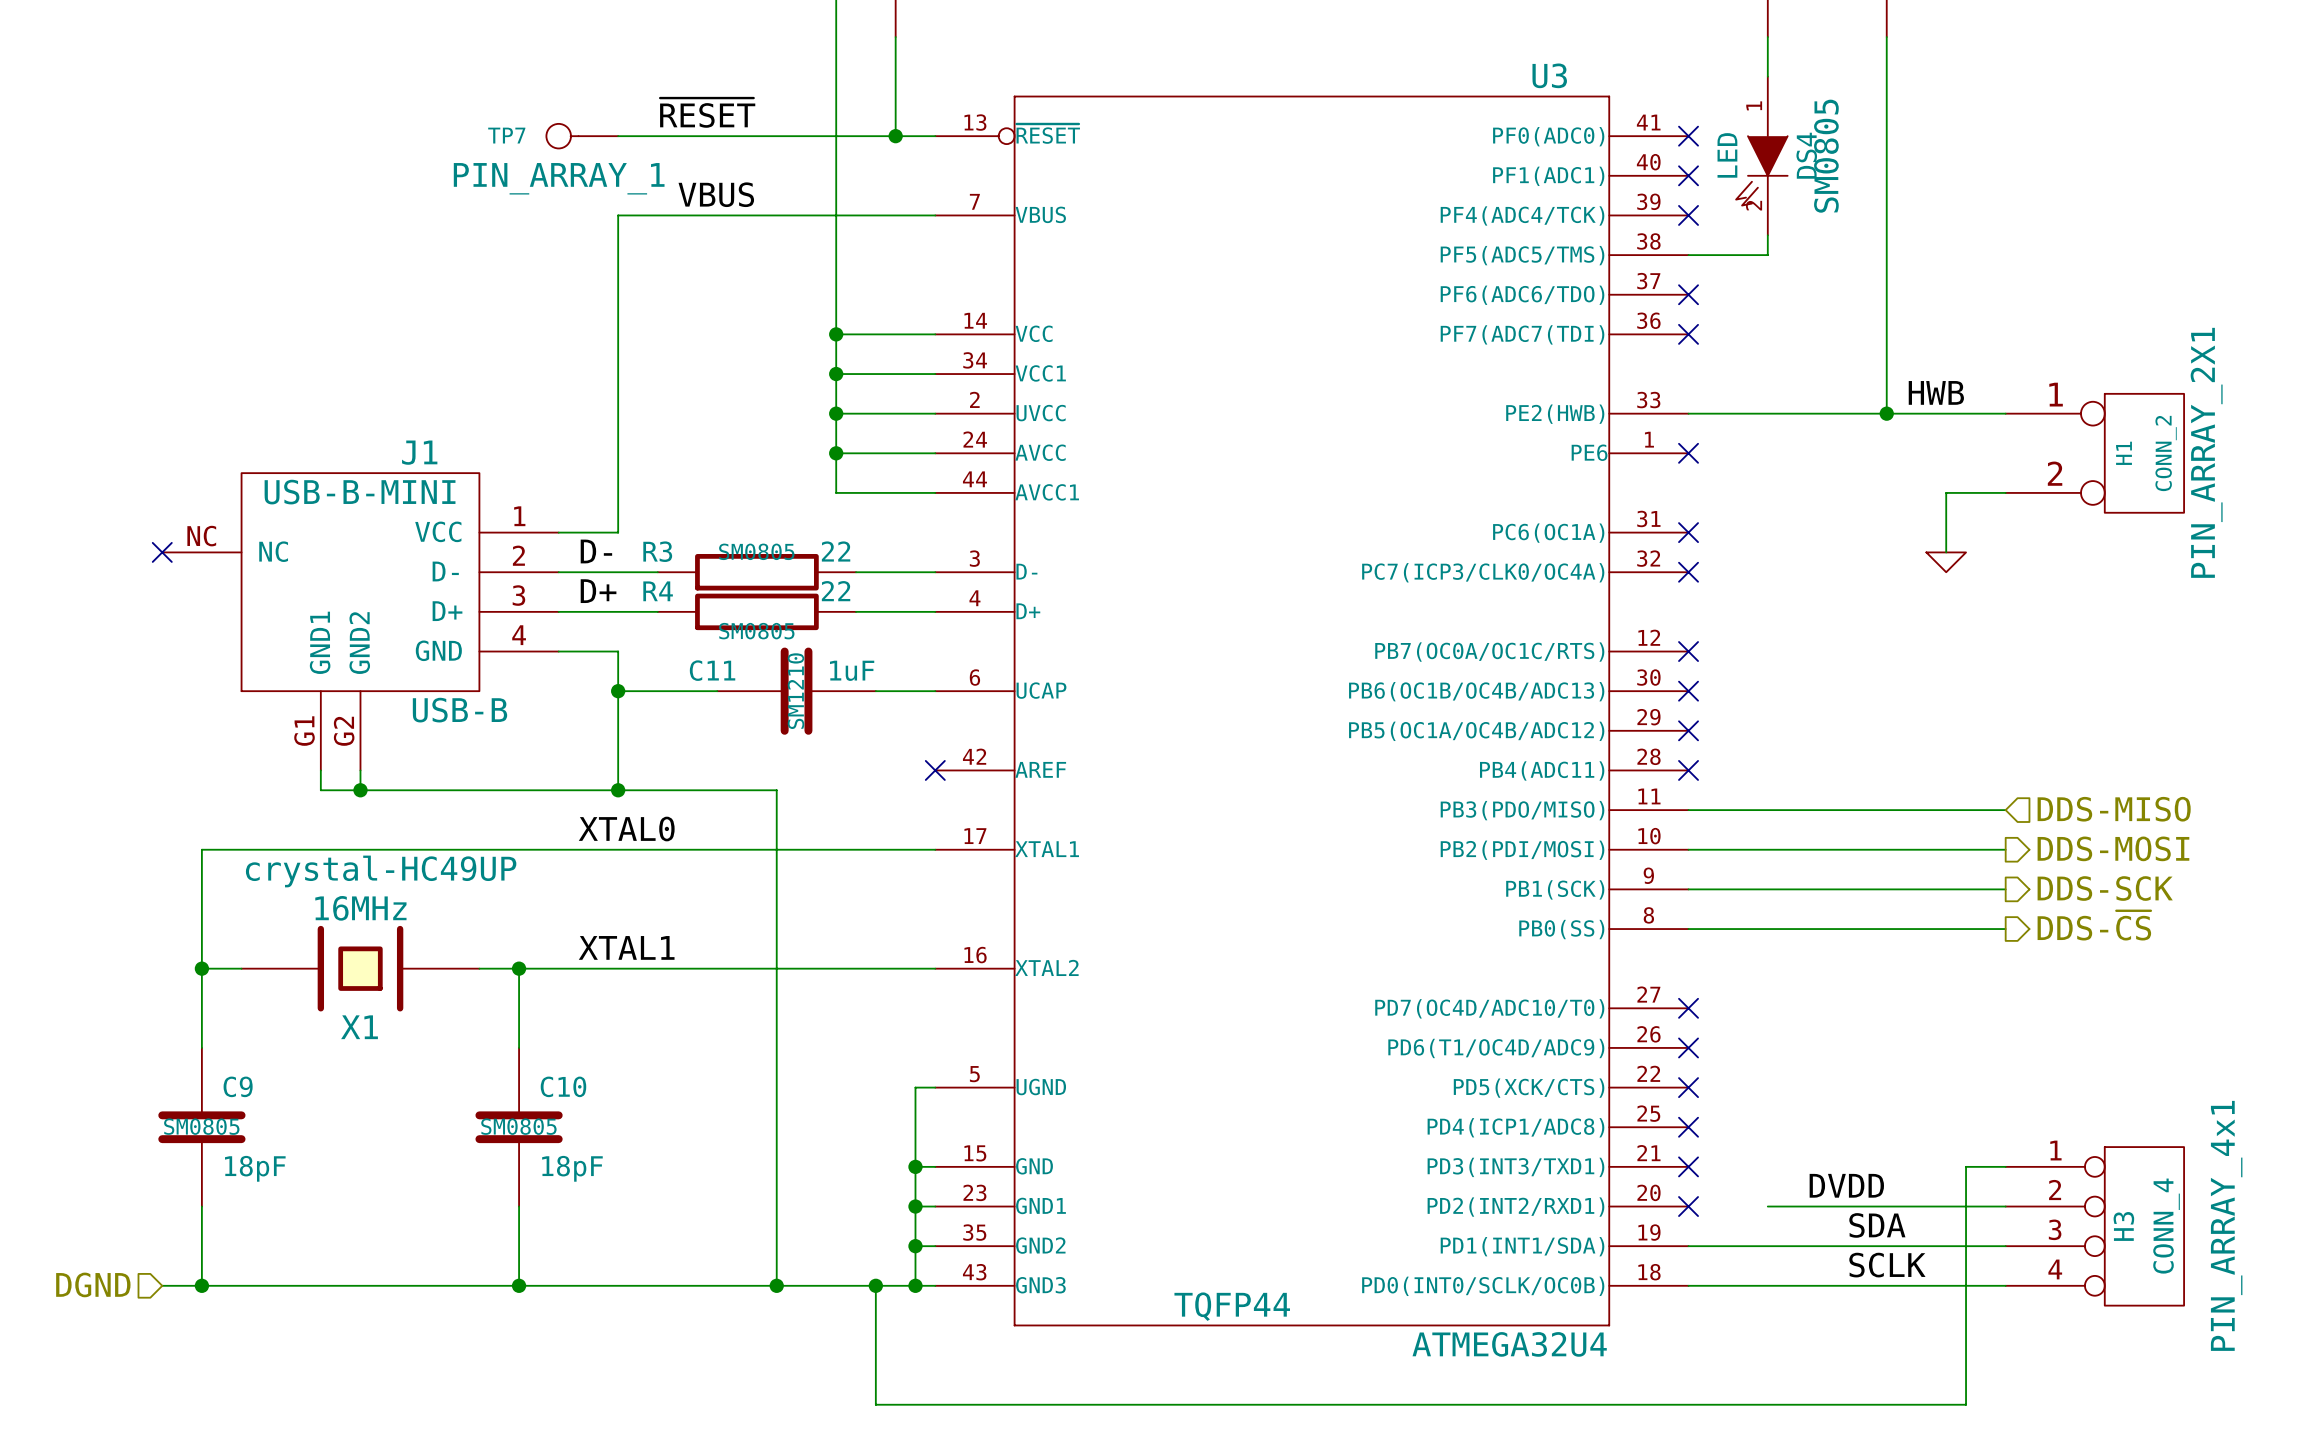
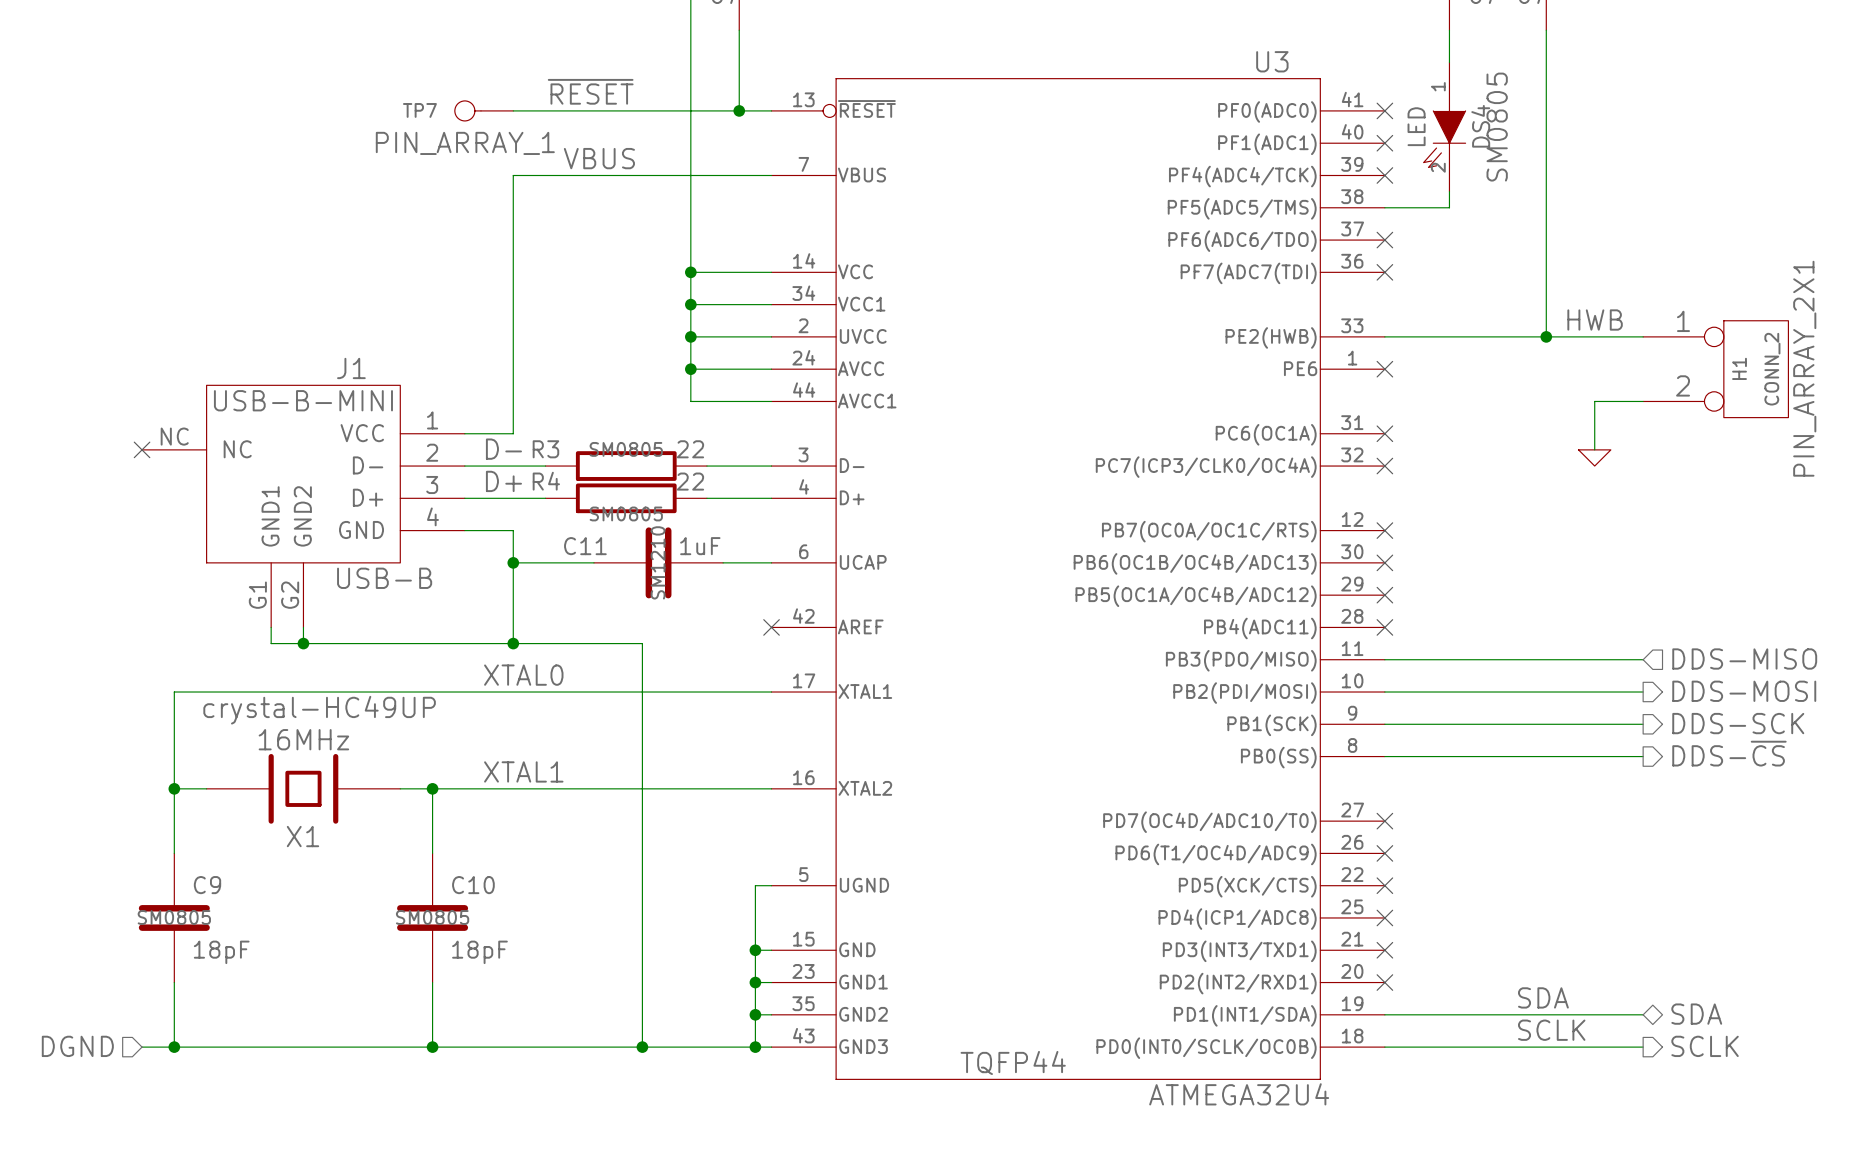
wire: (2005, 1166) (1966, 1166) (1966, 1404) (875, 1404) (875, 1285) -> none
label: DVDD (1846, 1185) -> none
wire: (1767, 1206) (2005, 1206) -> none
H3: CONN_4 (2094, 1226) -> none
hierarchical label: none -> SDA (1696, 1014)
hierarchical label: none -> SCLK (1705, 1046)
junction: (875, 1285) -> none

